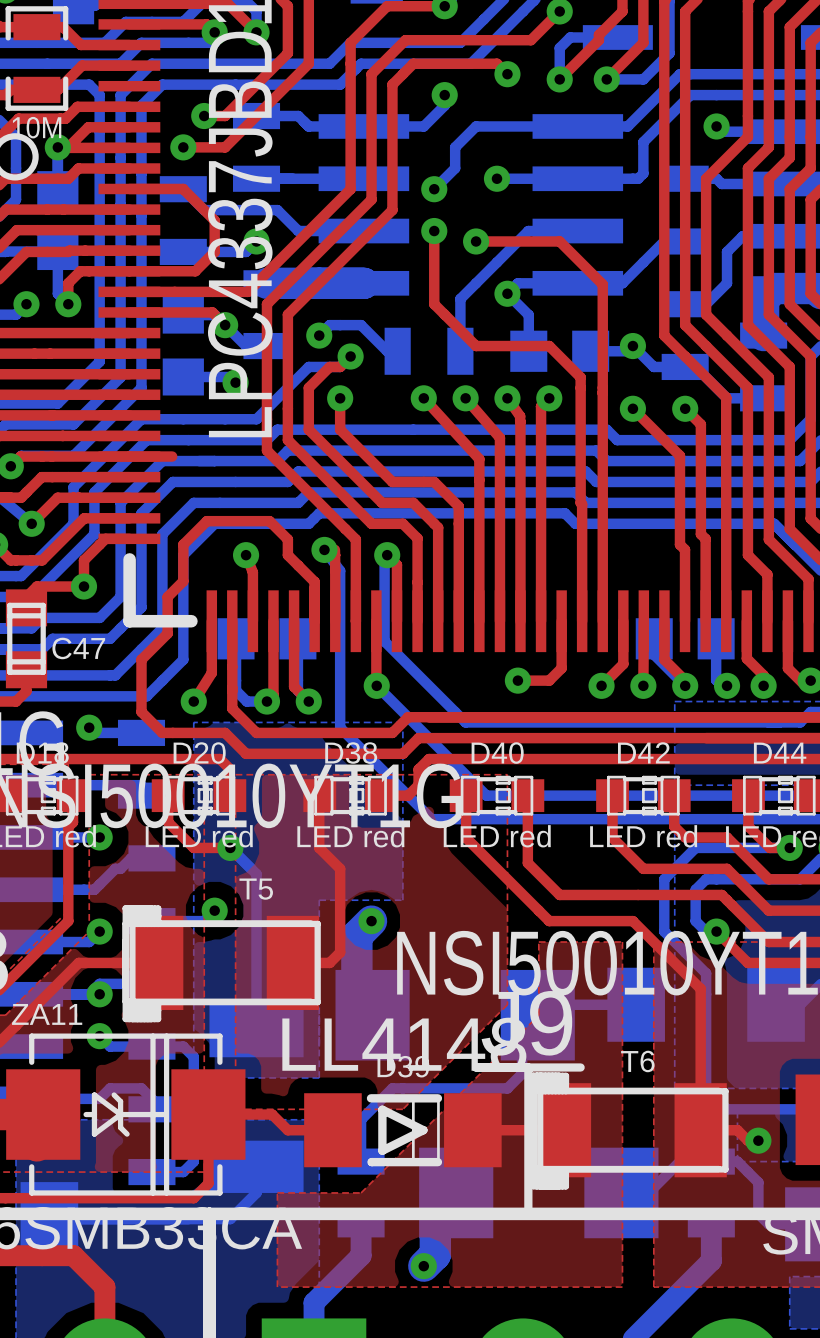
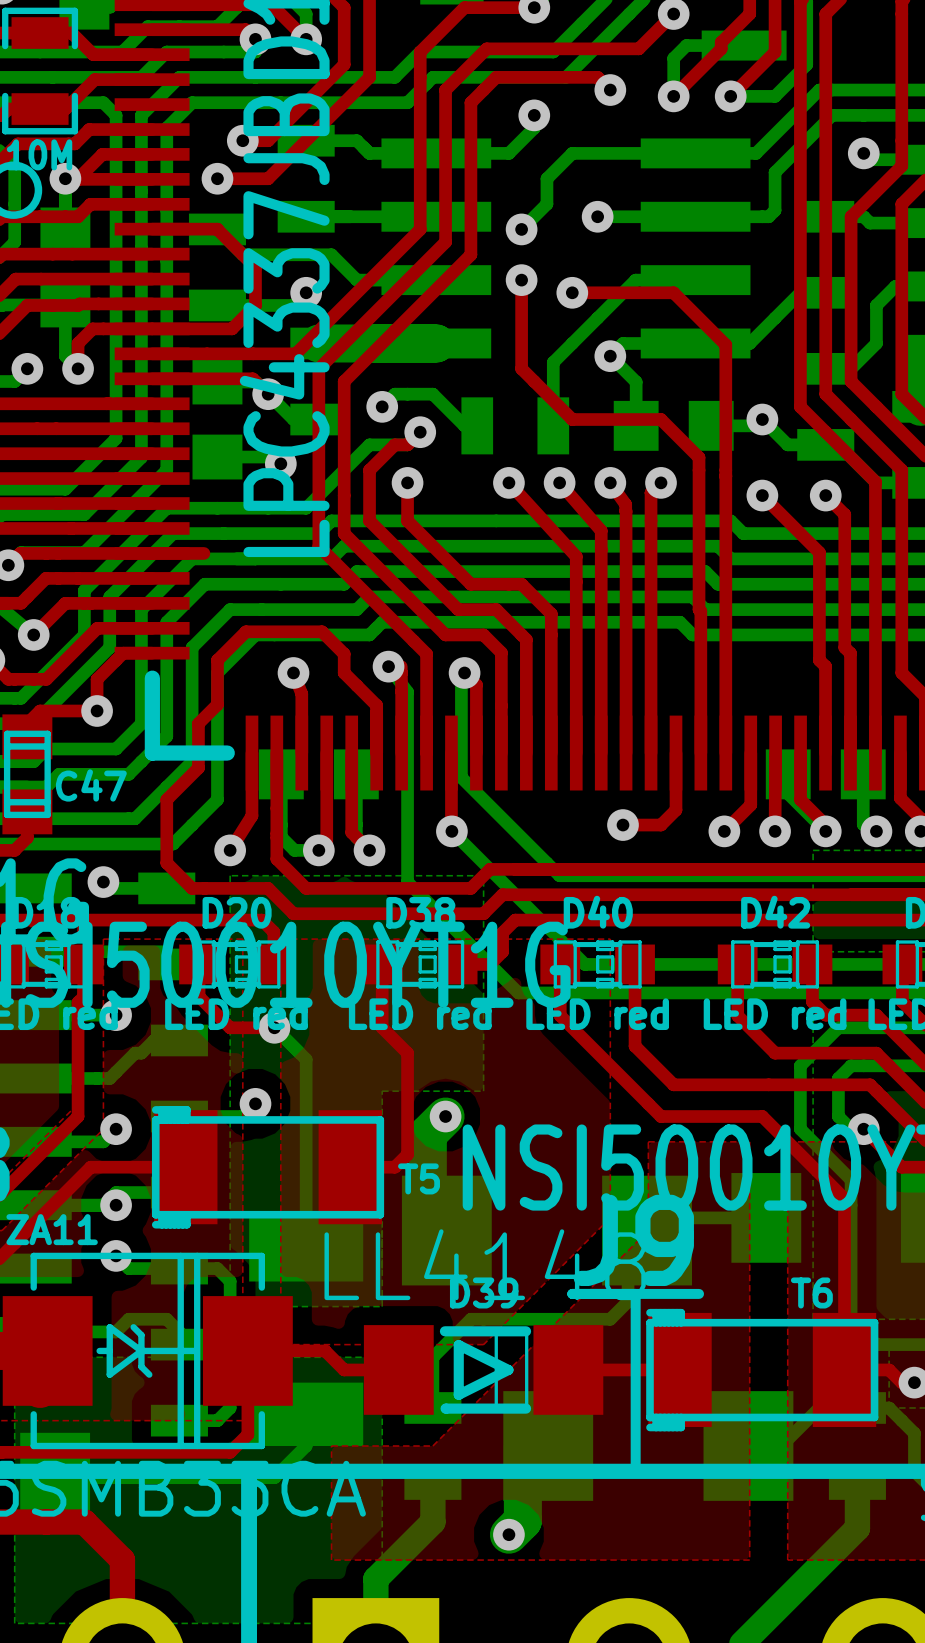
T5 name position: T5 (256, 889) -> T5 (419, 1178)
T5 footprint: [122, 905, 321, 1023] -> [151, 1106, 385, 1229]
T6 name position: T6 (637, 1061) -> T6 (811, 1292)
T6 footprint: [530, 1072, 729, 1190] -> [646, 1308, 879, 1432]

